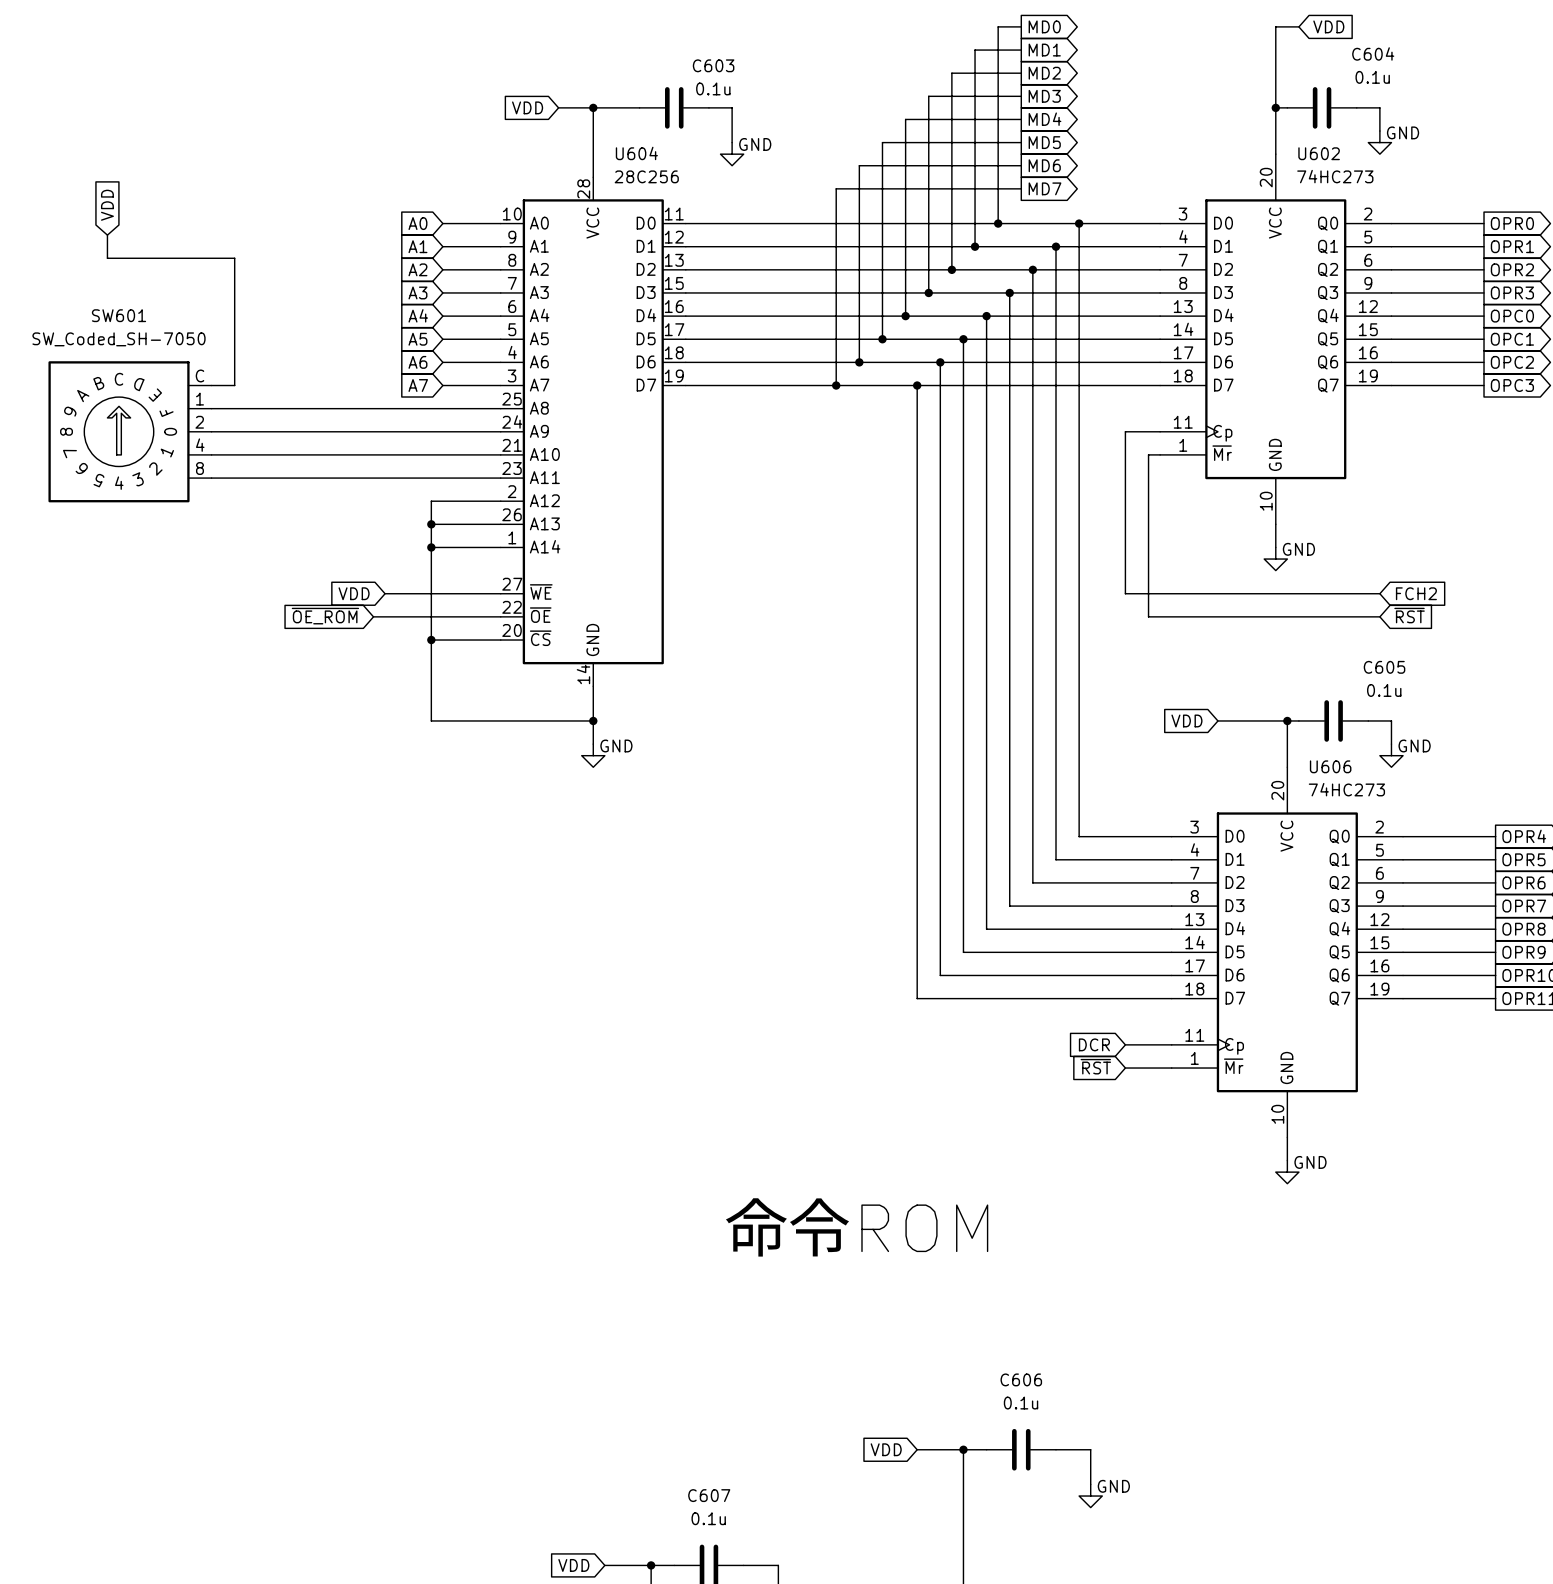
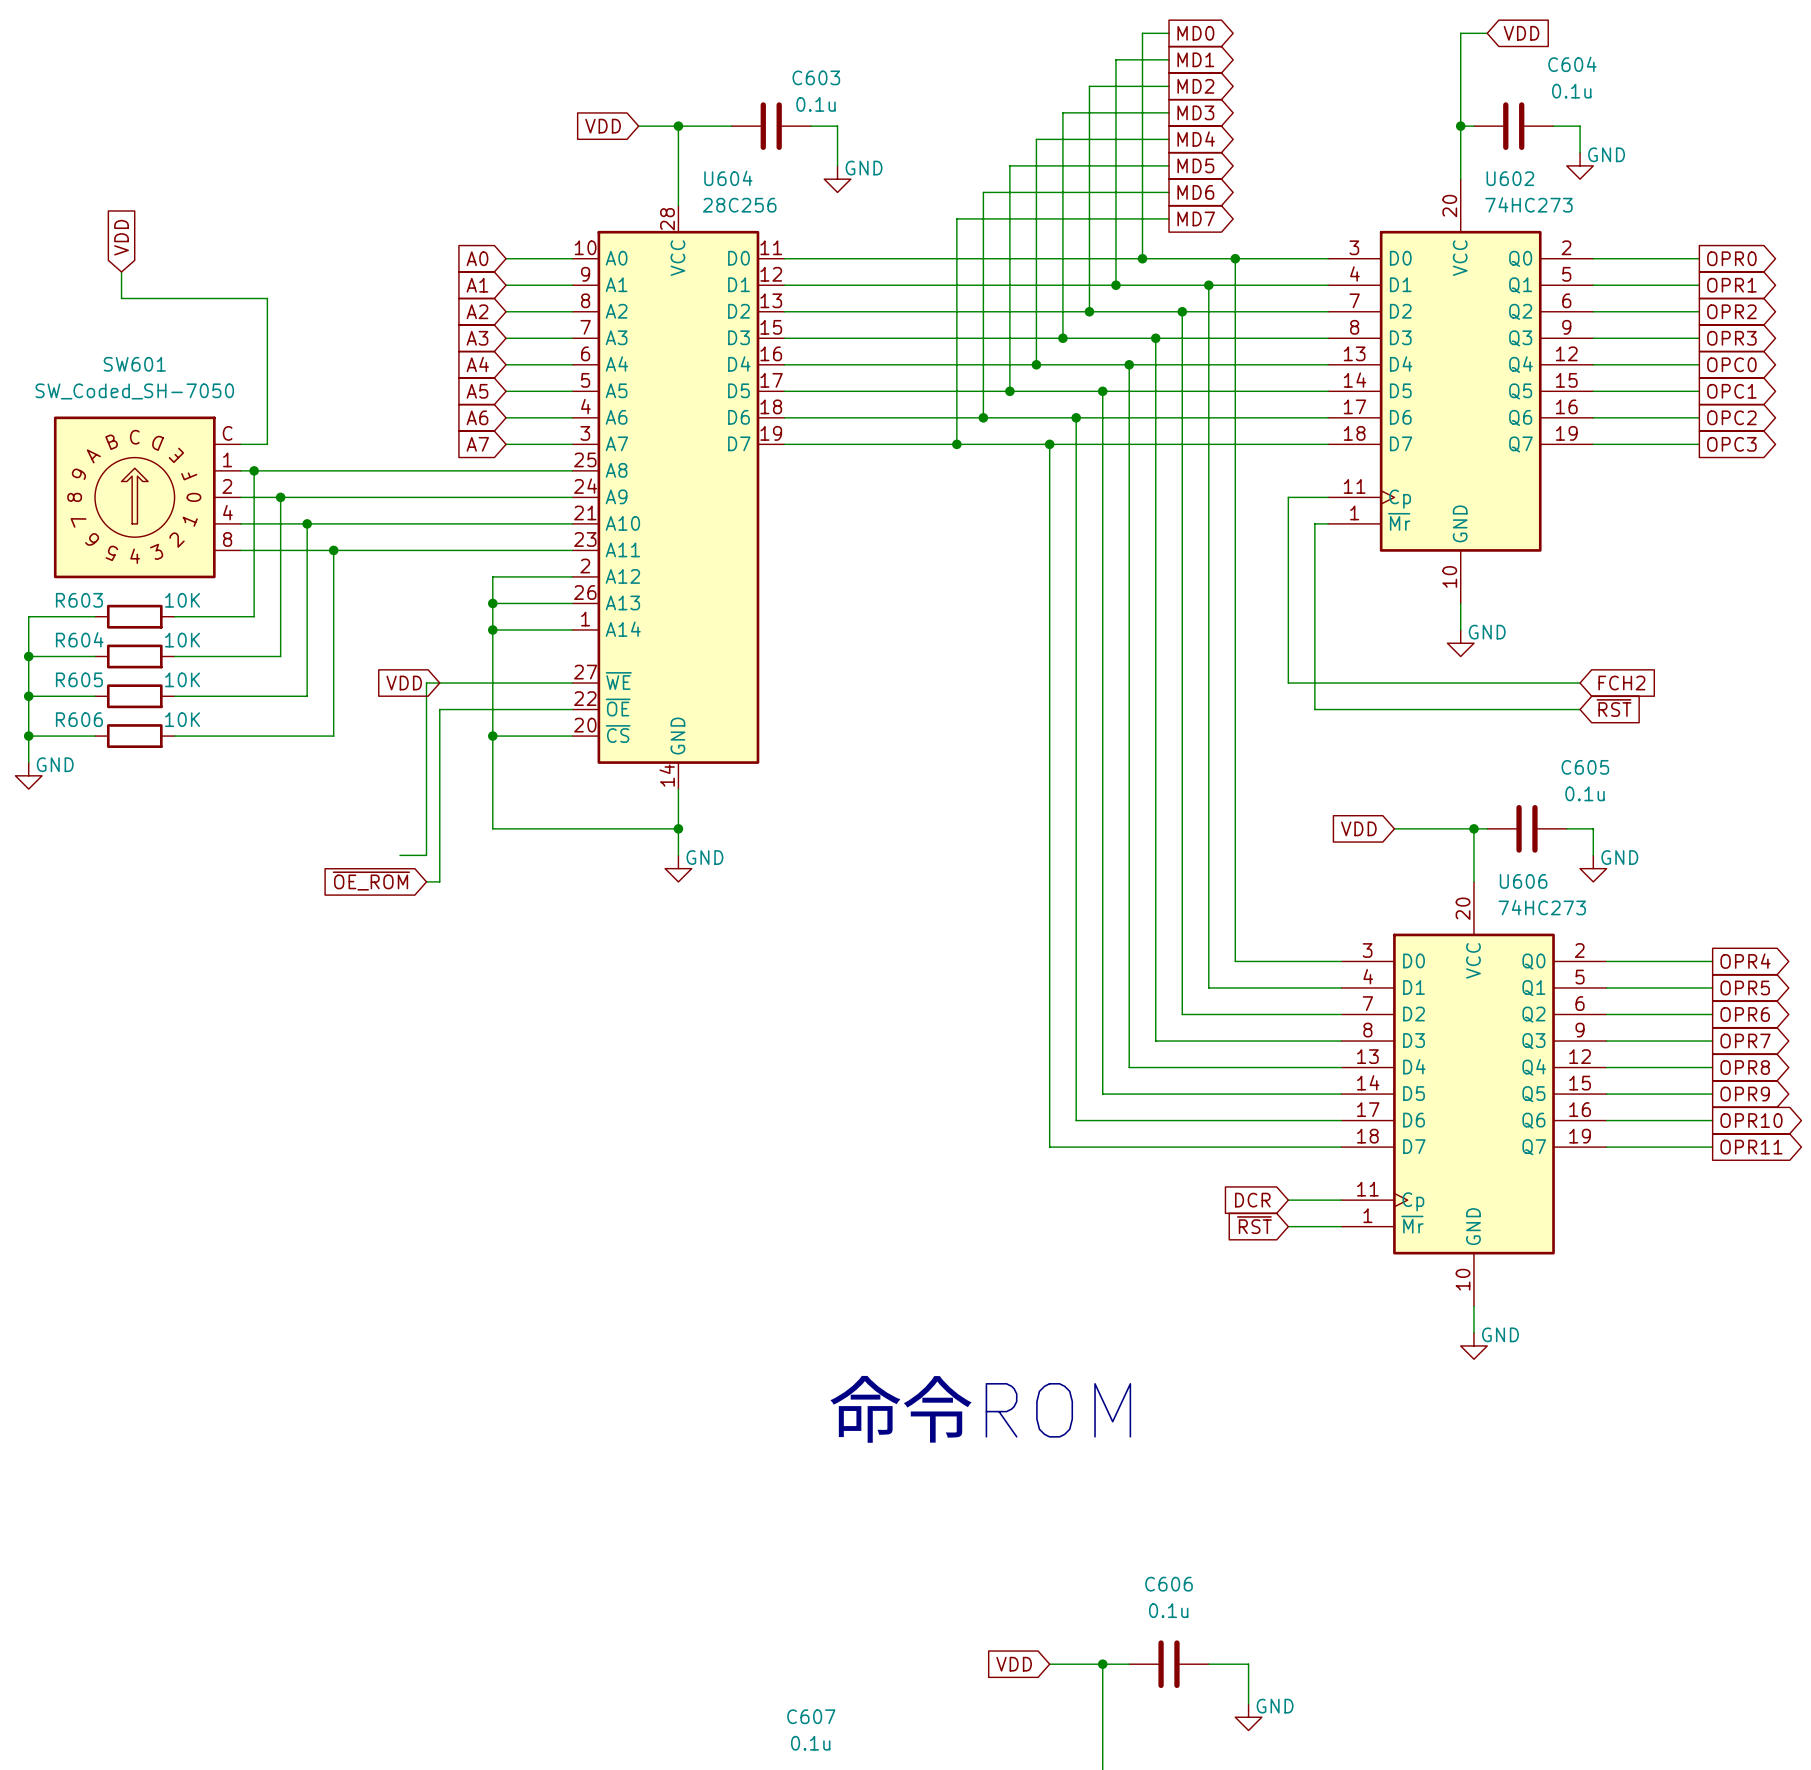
wire: none -> (254, 470) (254, 616) (174, 616)
junction: none -> (254, 470)
wire: none -> (280, 497) (280, 656) (174, 656)
junction: none -> (280, 497)
wire: none -> (307, 523) (307, 696) (174, 696)
junction: none -> (307, 523)
wire: none -> (333, 550) (333, 736) (174, 736)
junction: none -> (333, 550)
wire: none -> (95, 616) (28, 616) (28, 762)
R603: none -> 10K (134, 616)
wire: none -> (28, 656) (95, 656)
junction: none -> (28, 656)
R604: none -> 10K (134, 656)
wire: none -> (439, 683) (426, 683) (426, 855) (399, 855)
wire: none -> (28, 696) (95, 696)
junction: none -> (28, 696)
R605: none -> 10K (134, 696)
global label position: ~{OE_ROM} (325, 616) -> ~{OE_ROM} (371, 881)
wire: (373, 616) (385, 616) -> (426, 881) (439, 881) (439, 709)
wire: none -> (28, 736) (95, 736)
junction: none -> (28, 736)
R606: none -> 10K (134, 736)
power symbol: none -> GND (28, 775)

